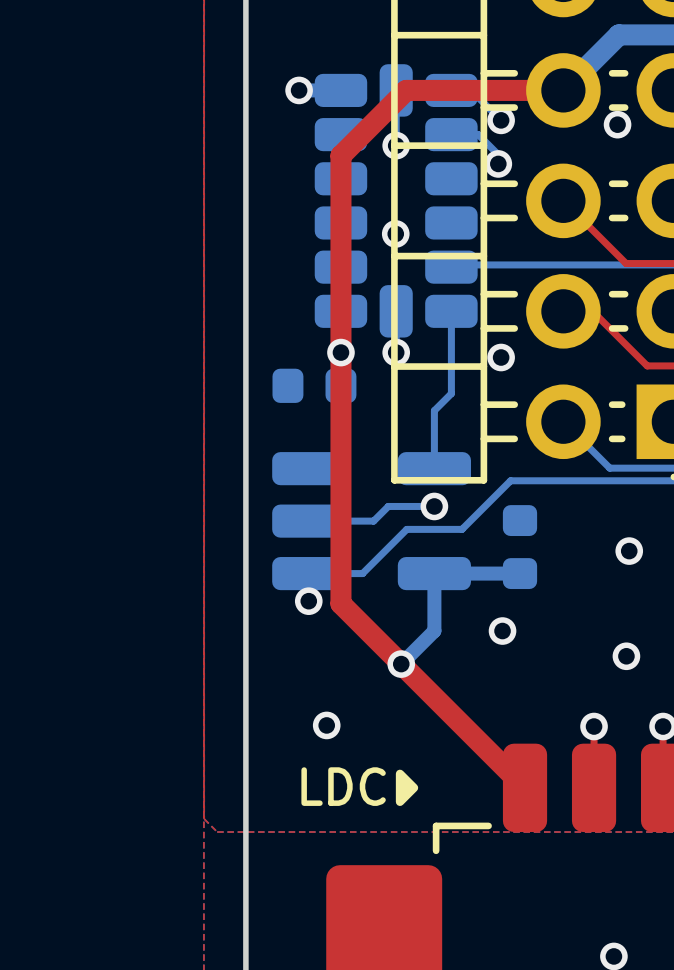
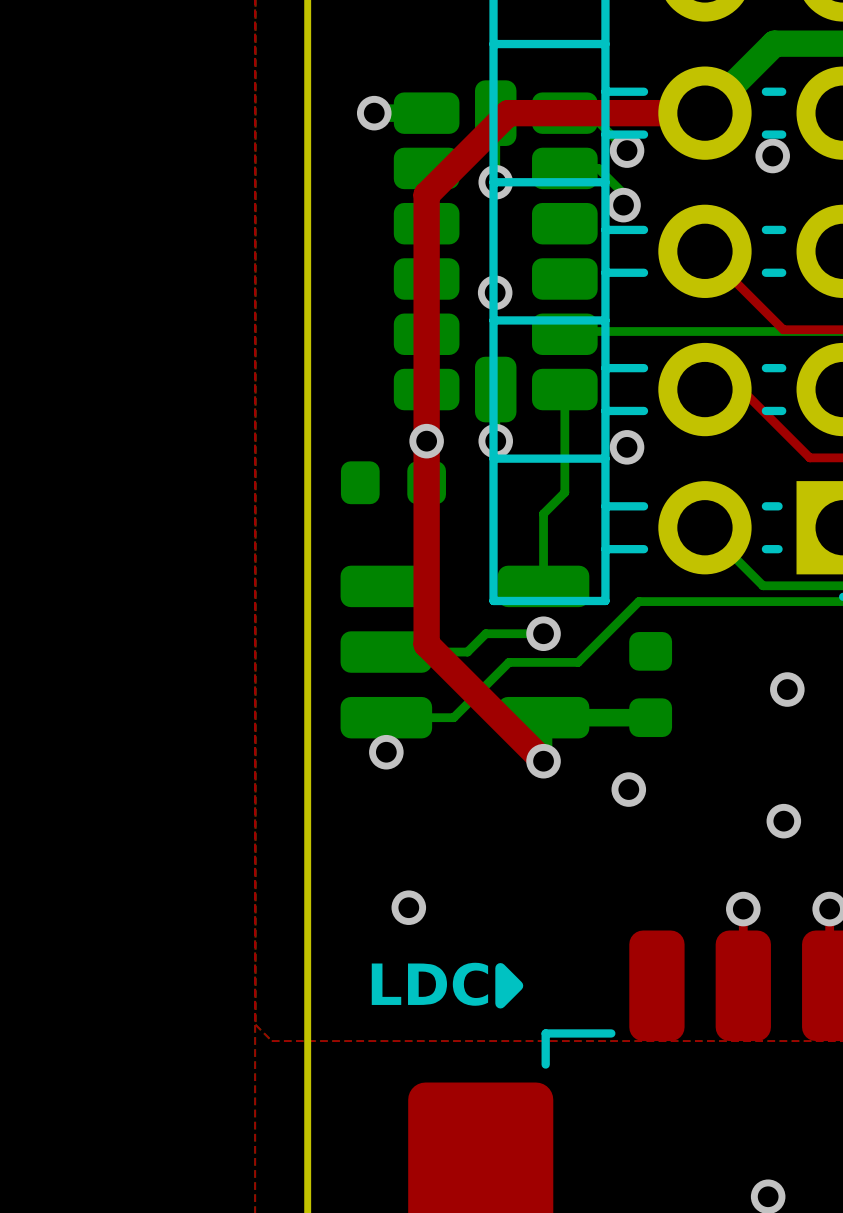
top track: (340, 514) (340, 603) (525, 787) -> (426, 644) (543, 761)
bottom track: (434, 608) (434, 630) (401, 664) -> none
via position: (401, 664) -> (543, 761)

